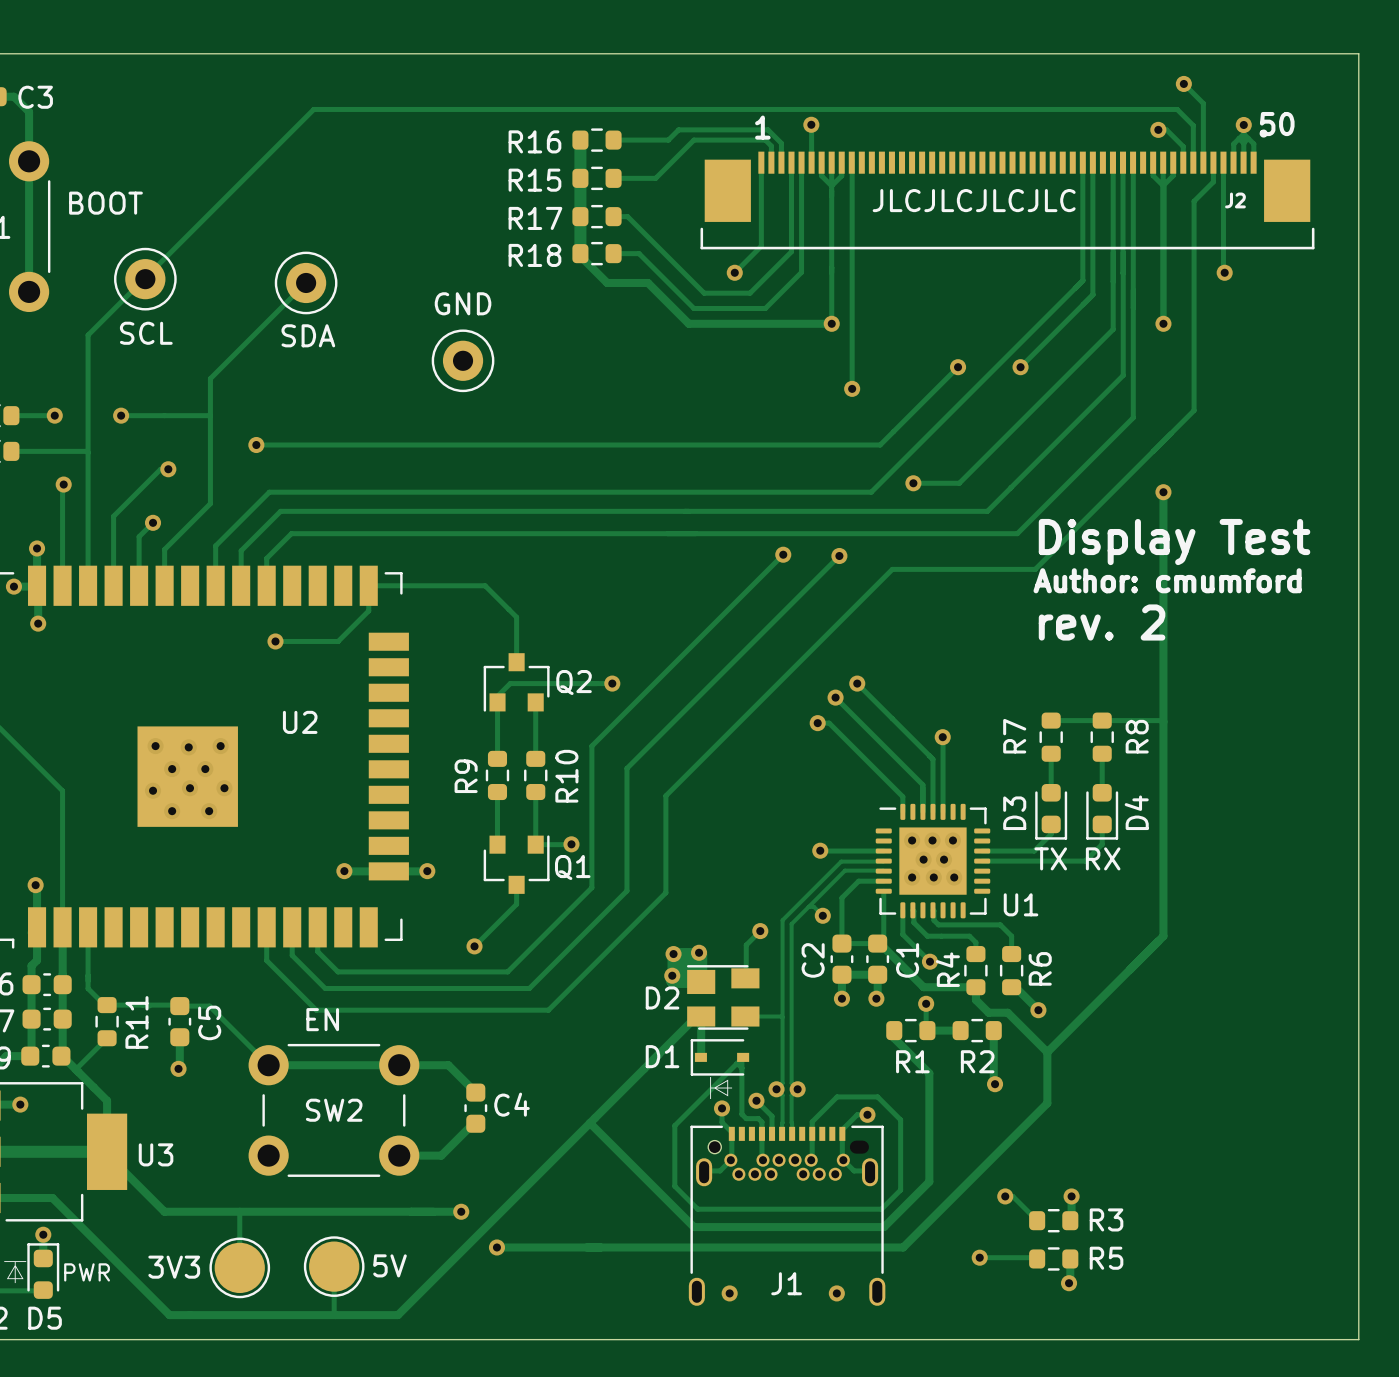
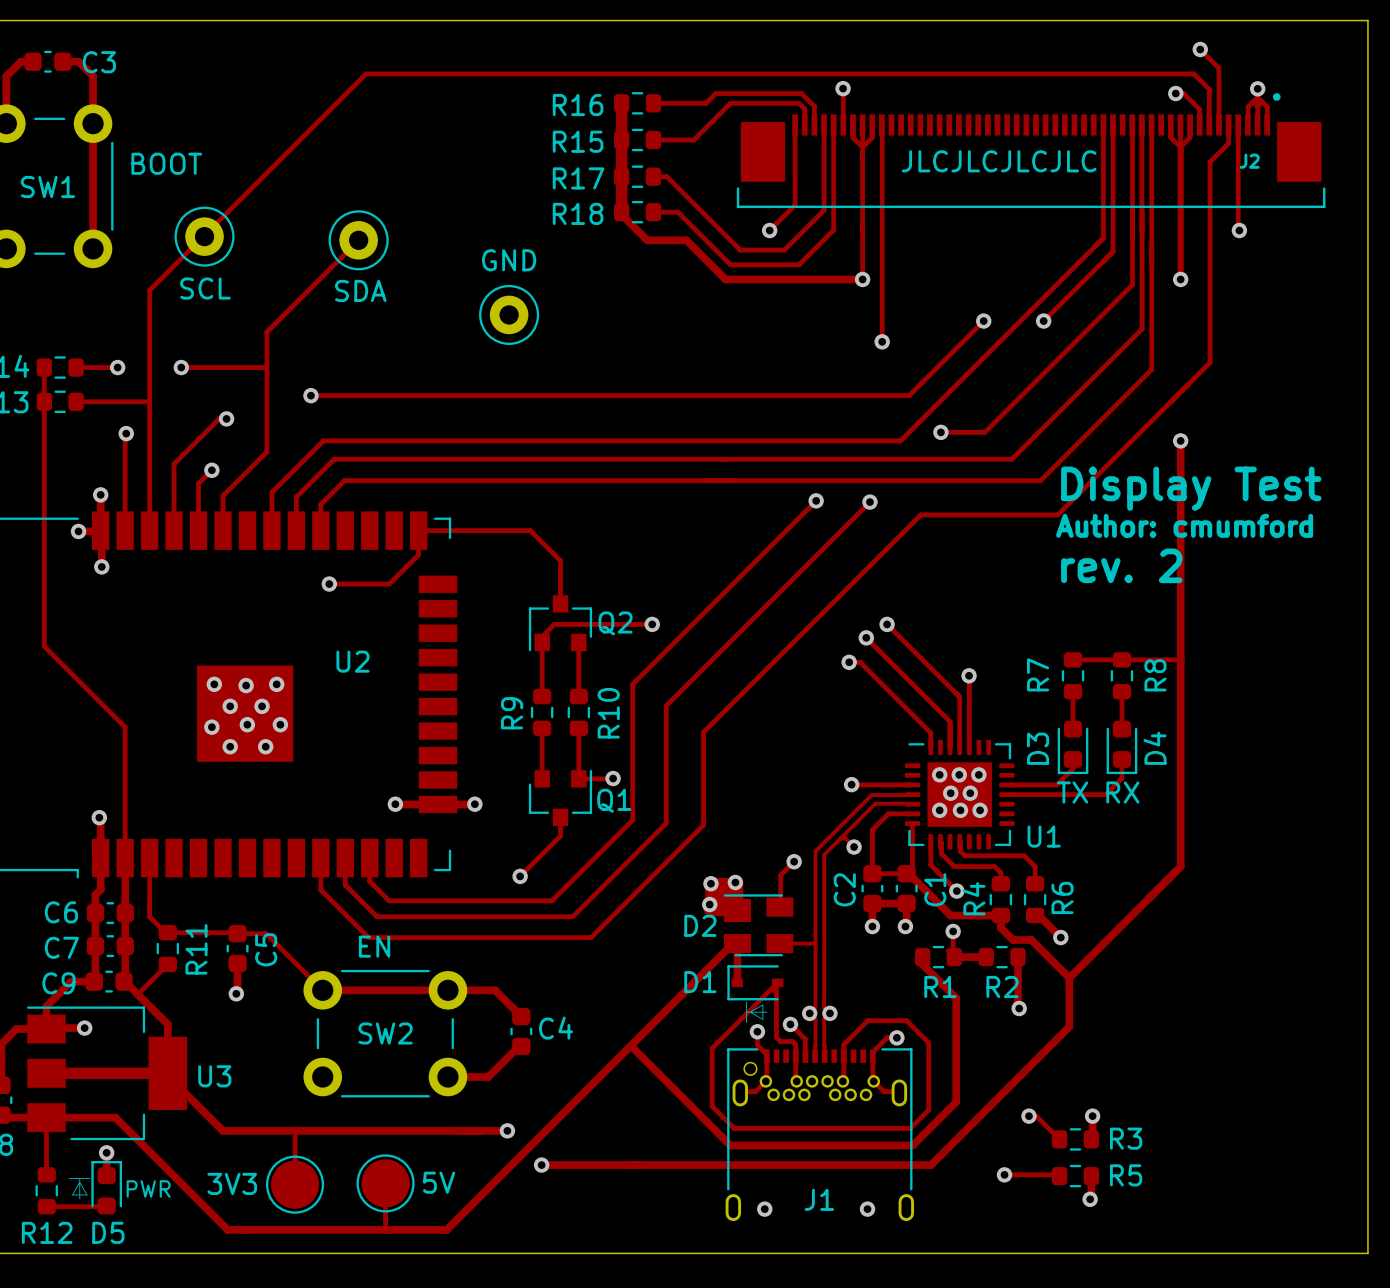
text: 50 (1277, 124) -> none
text: 1 (762, 127) -> none

